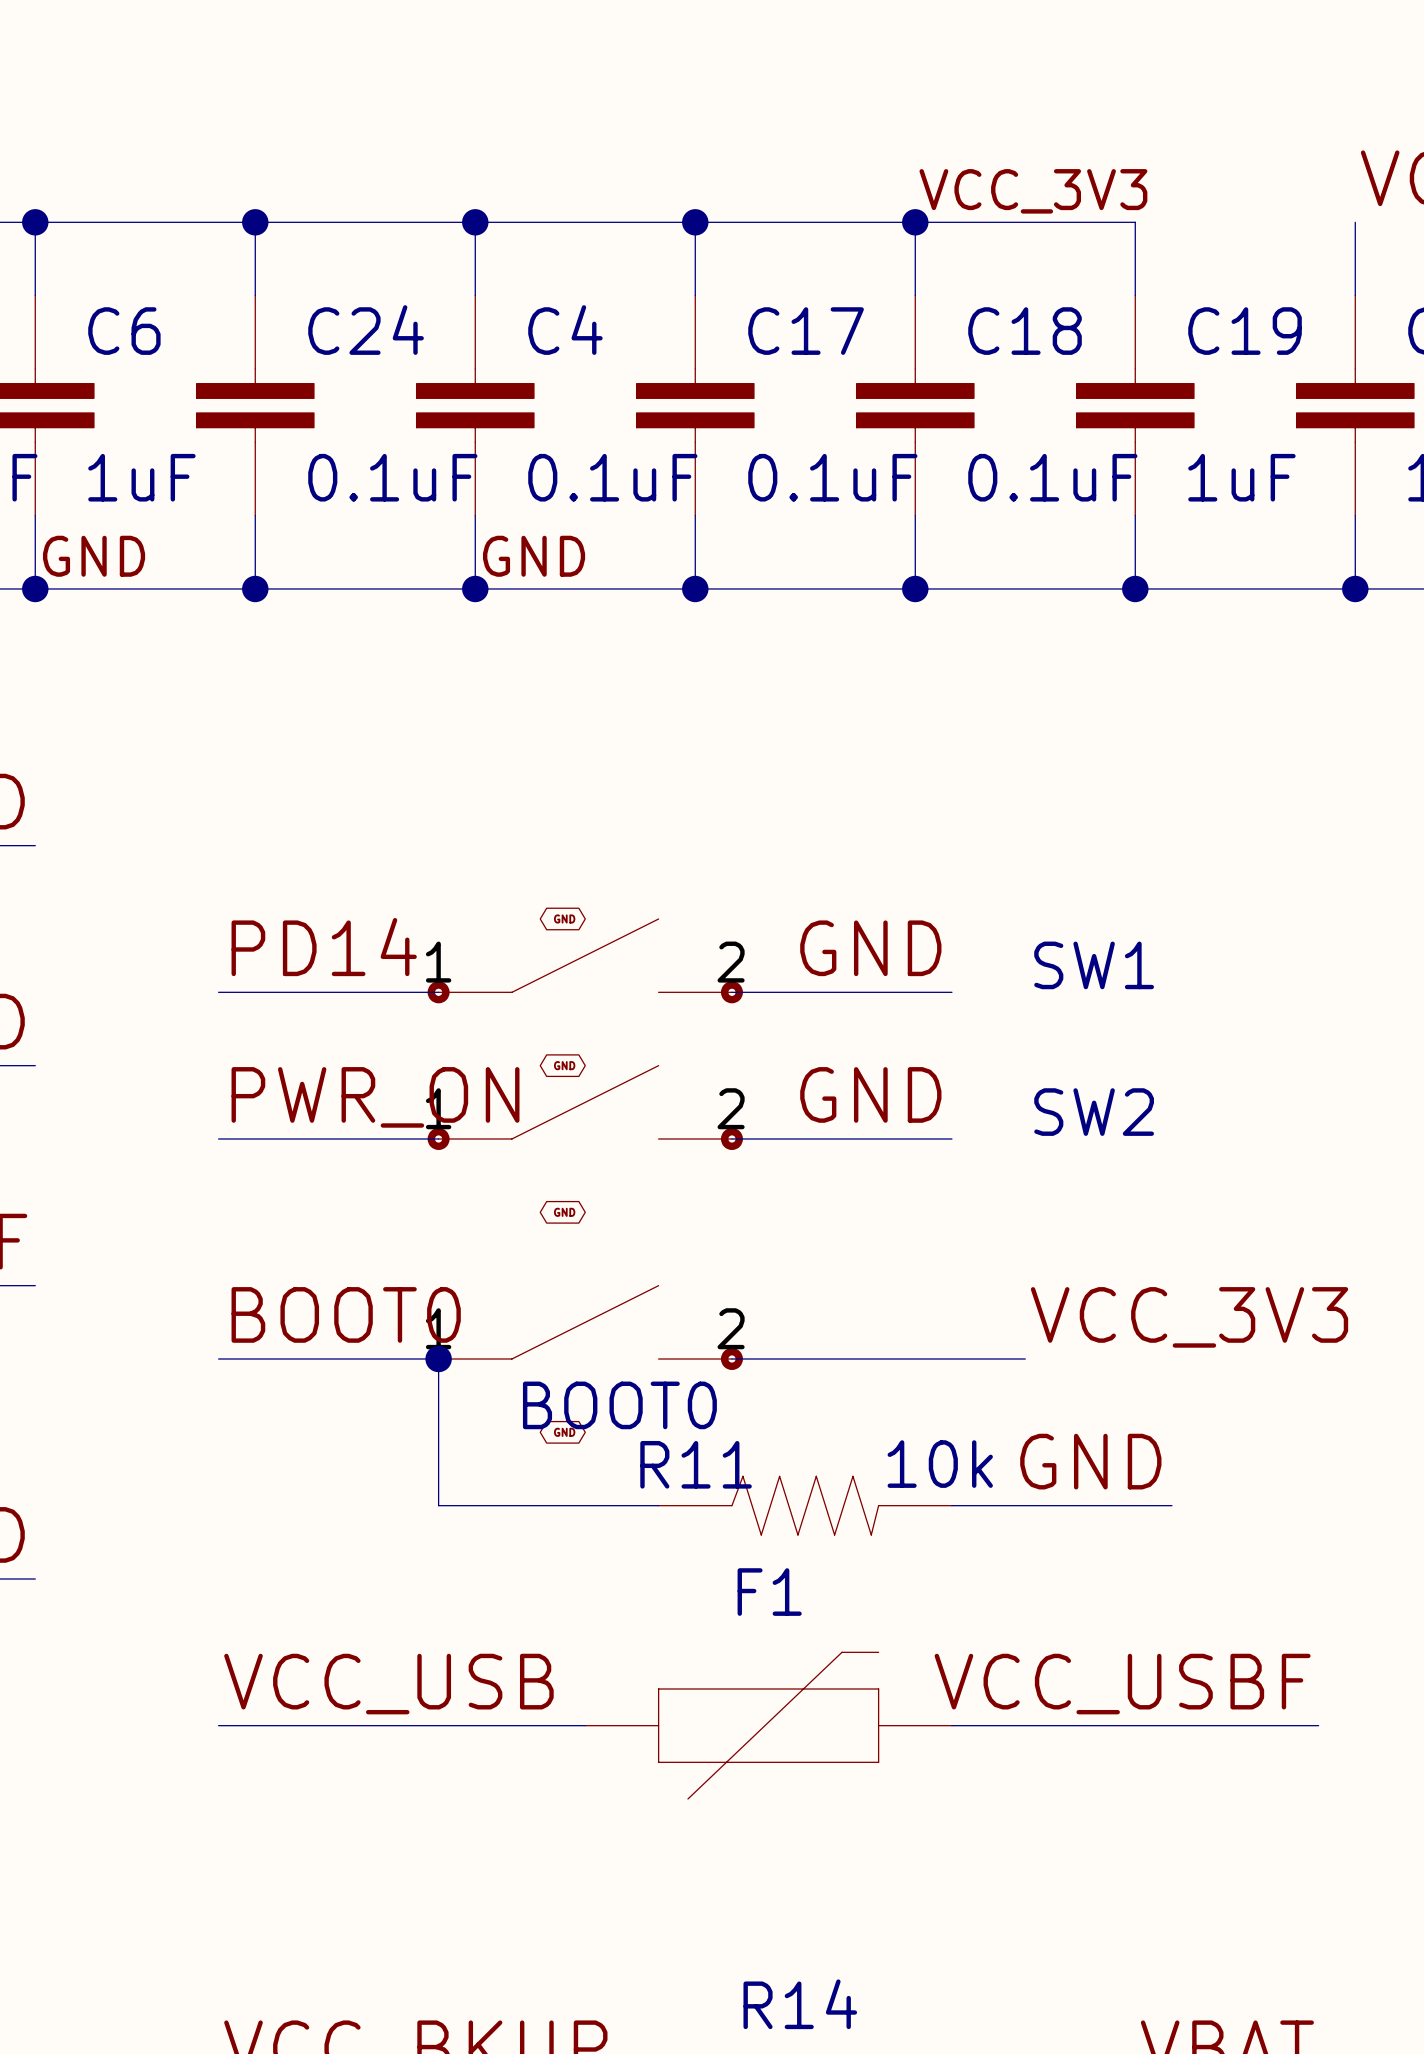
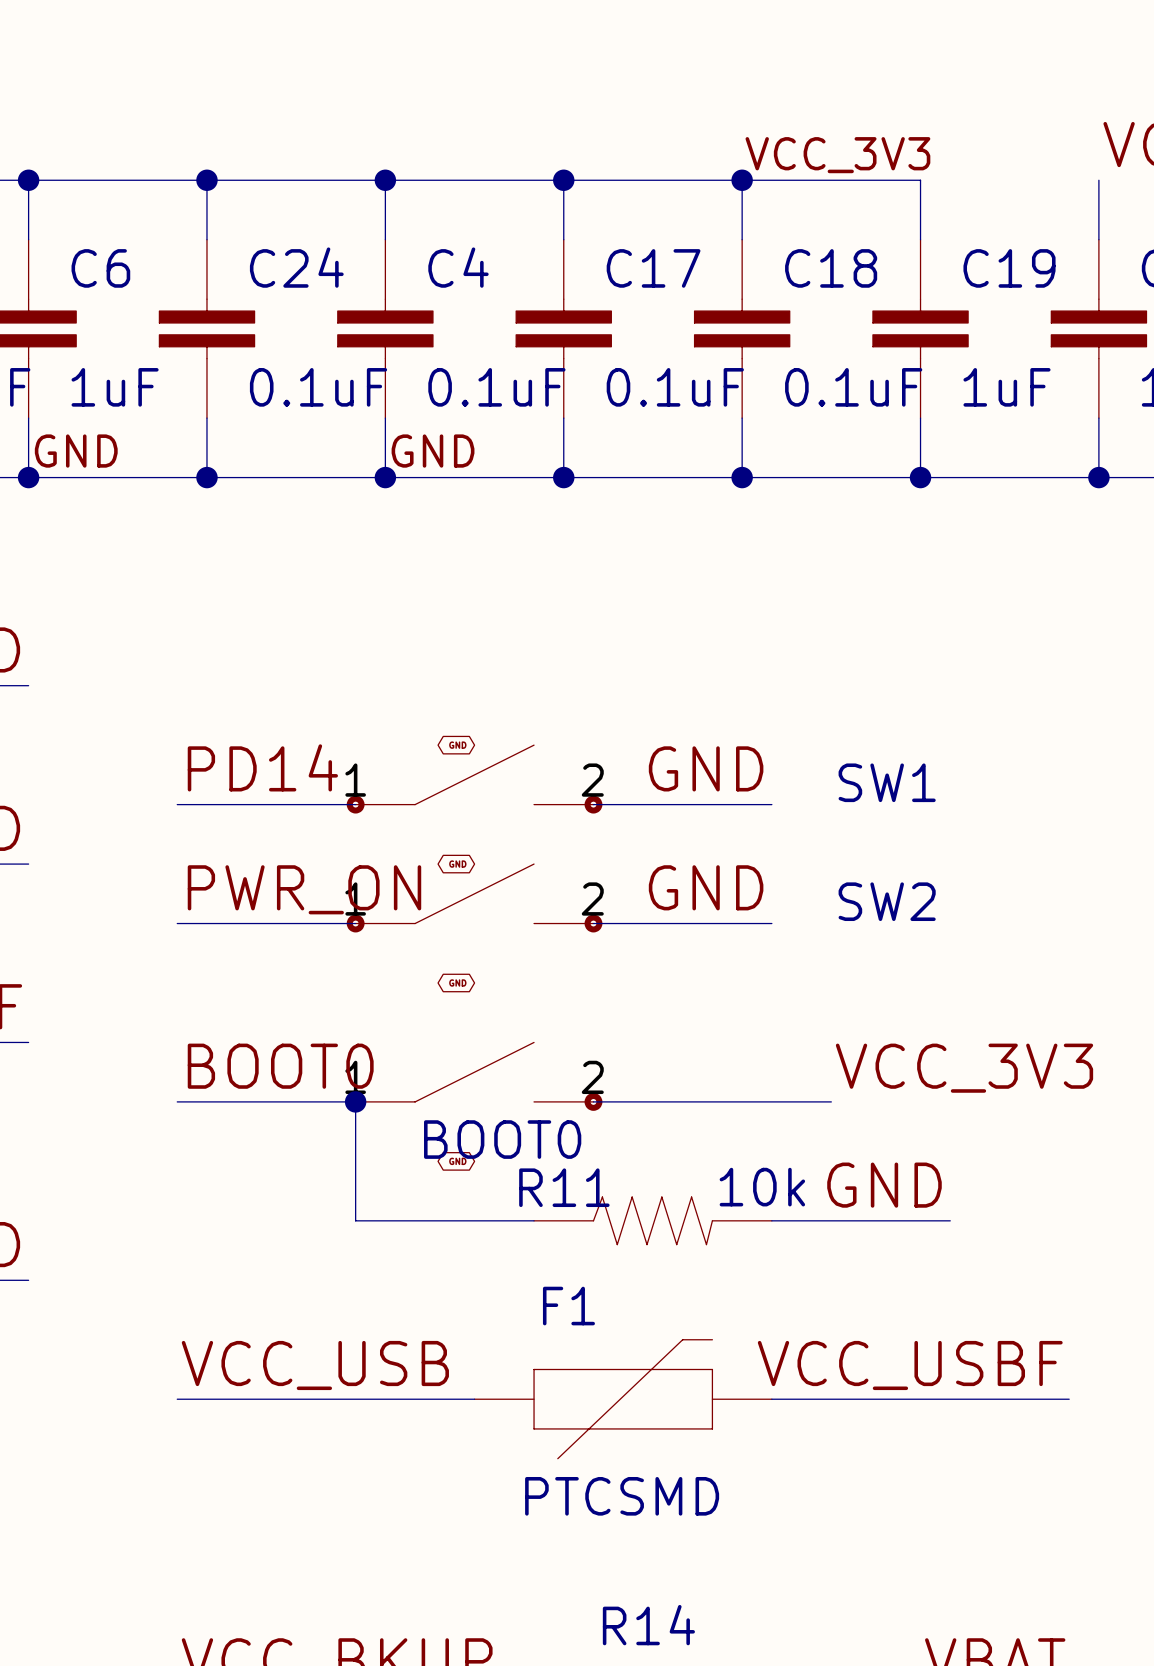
F1 name position: F1 (769, 1592) -> F1 (568, 1306)
F1 value: none -> PTCSMD (622, 1496)

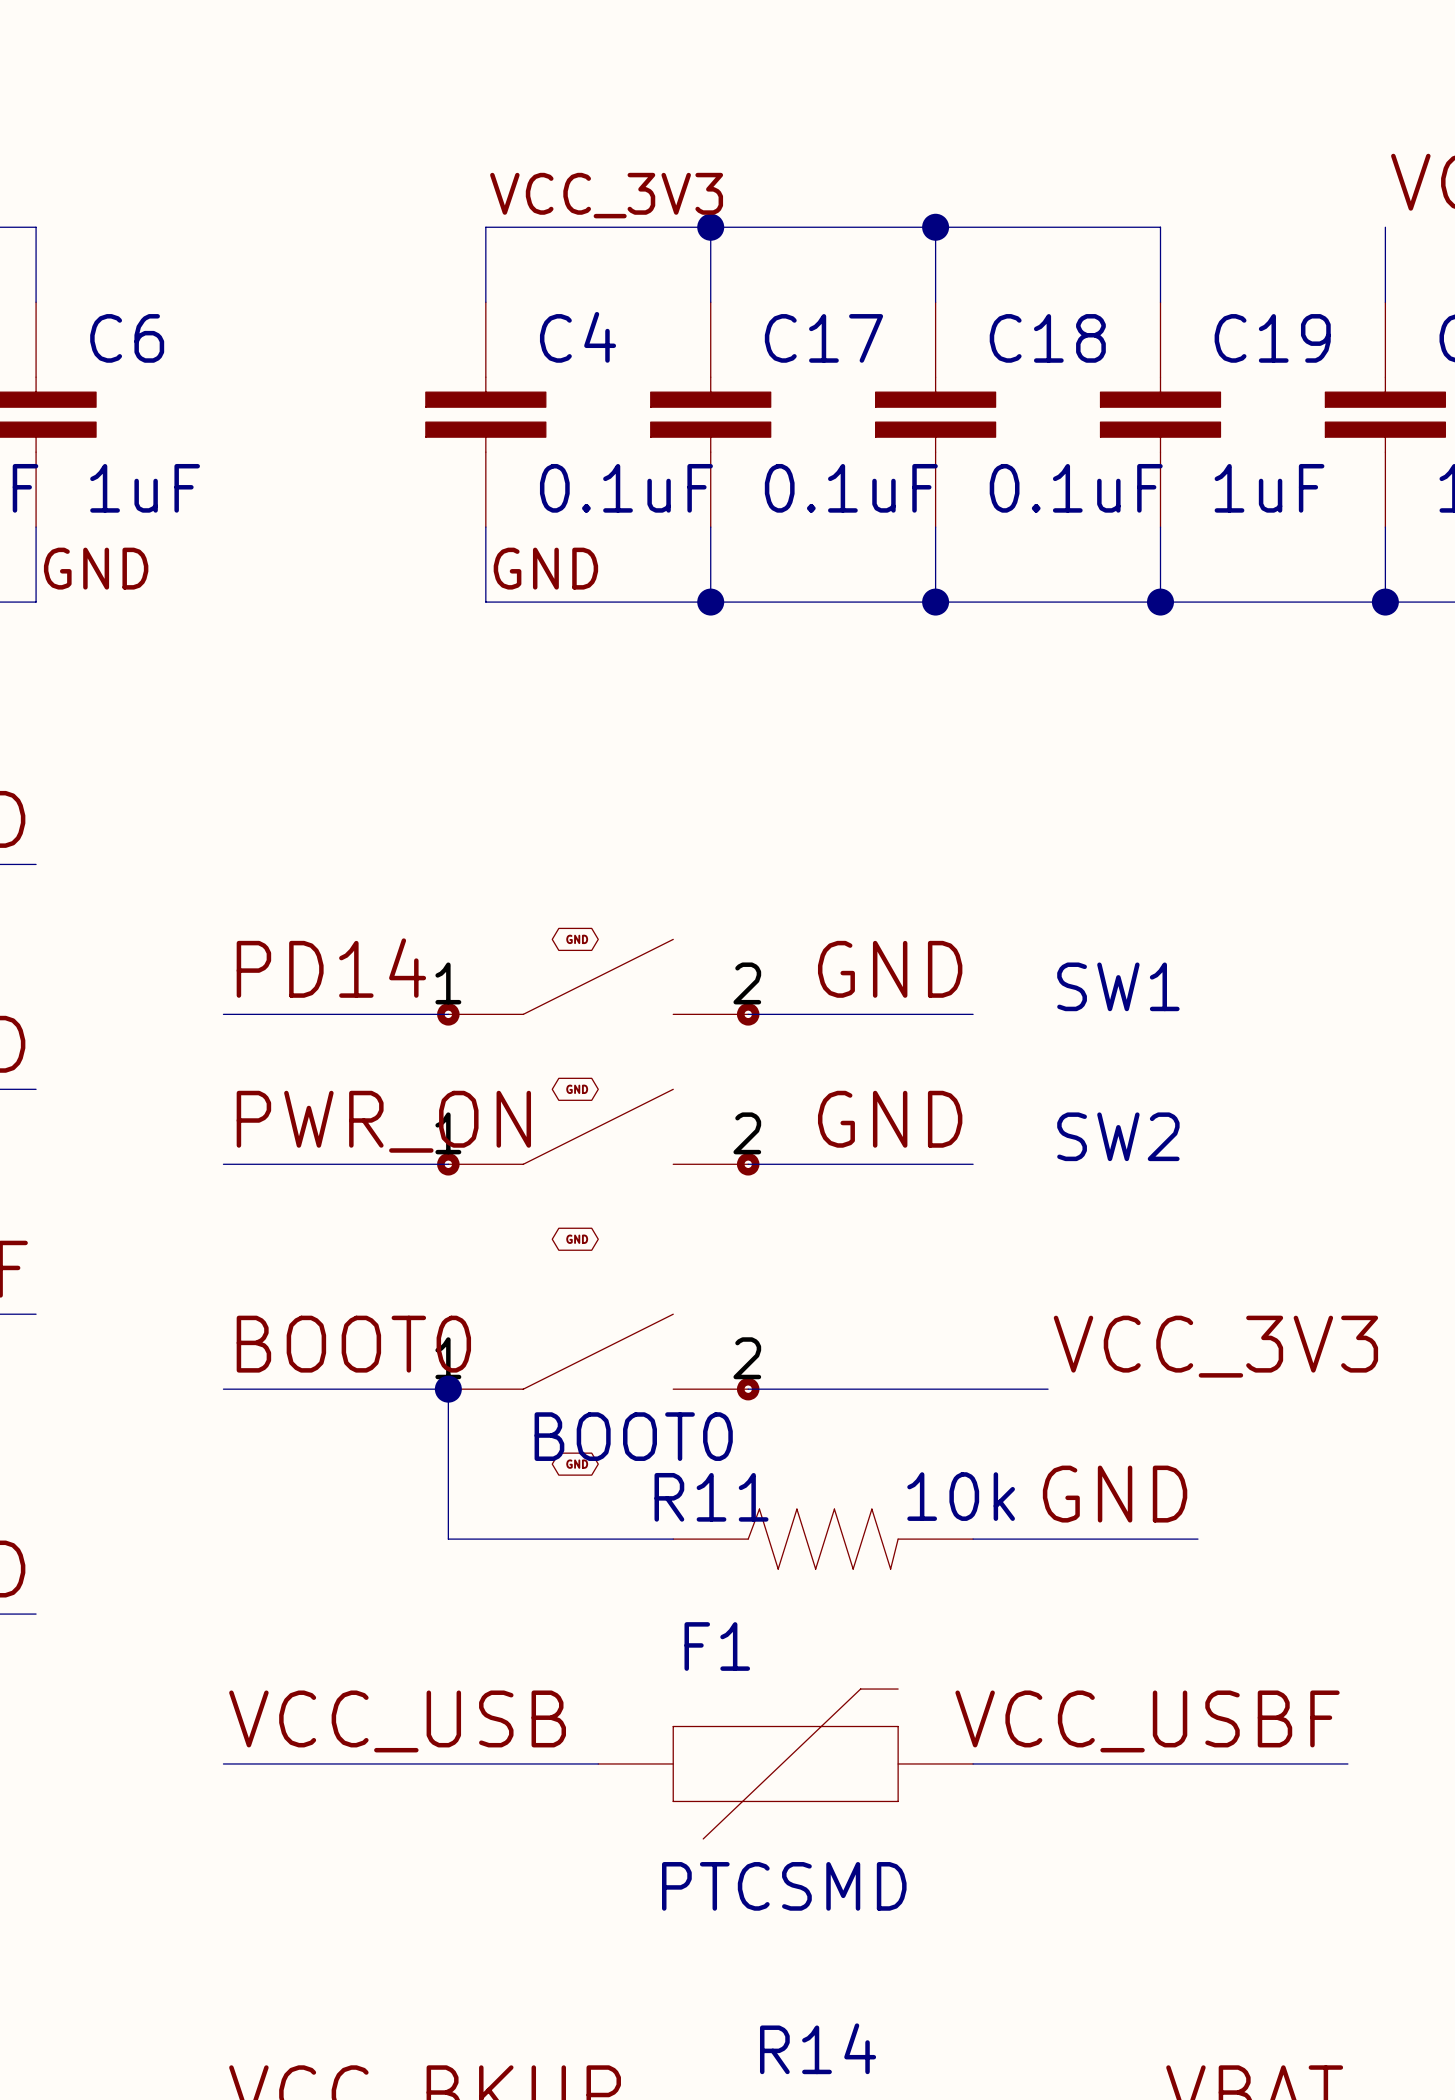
label position: VCC_3V3 (837, 155) -> VCC_3V3 (606, 195)
wire: (28, 180) (385, 180) -> none
junction: (28, 180) -> none
wire: (206, 180) (206, 239) -> none
junction: (206, 180) -> none
junction: (385, 180) -> none
C24: 0.1uF (206, 328) -> none
wire: (206, 418) (206, 477) -> none
wire: (28, 477) (385, 477) -> none
junction: (28, 477) -> none
junction: (206, 477) -> none
junction: (385, 477) -> none

